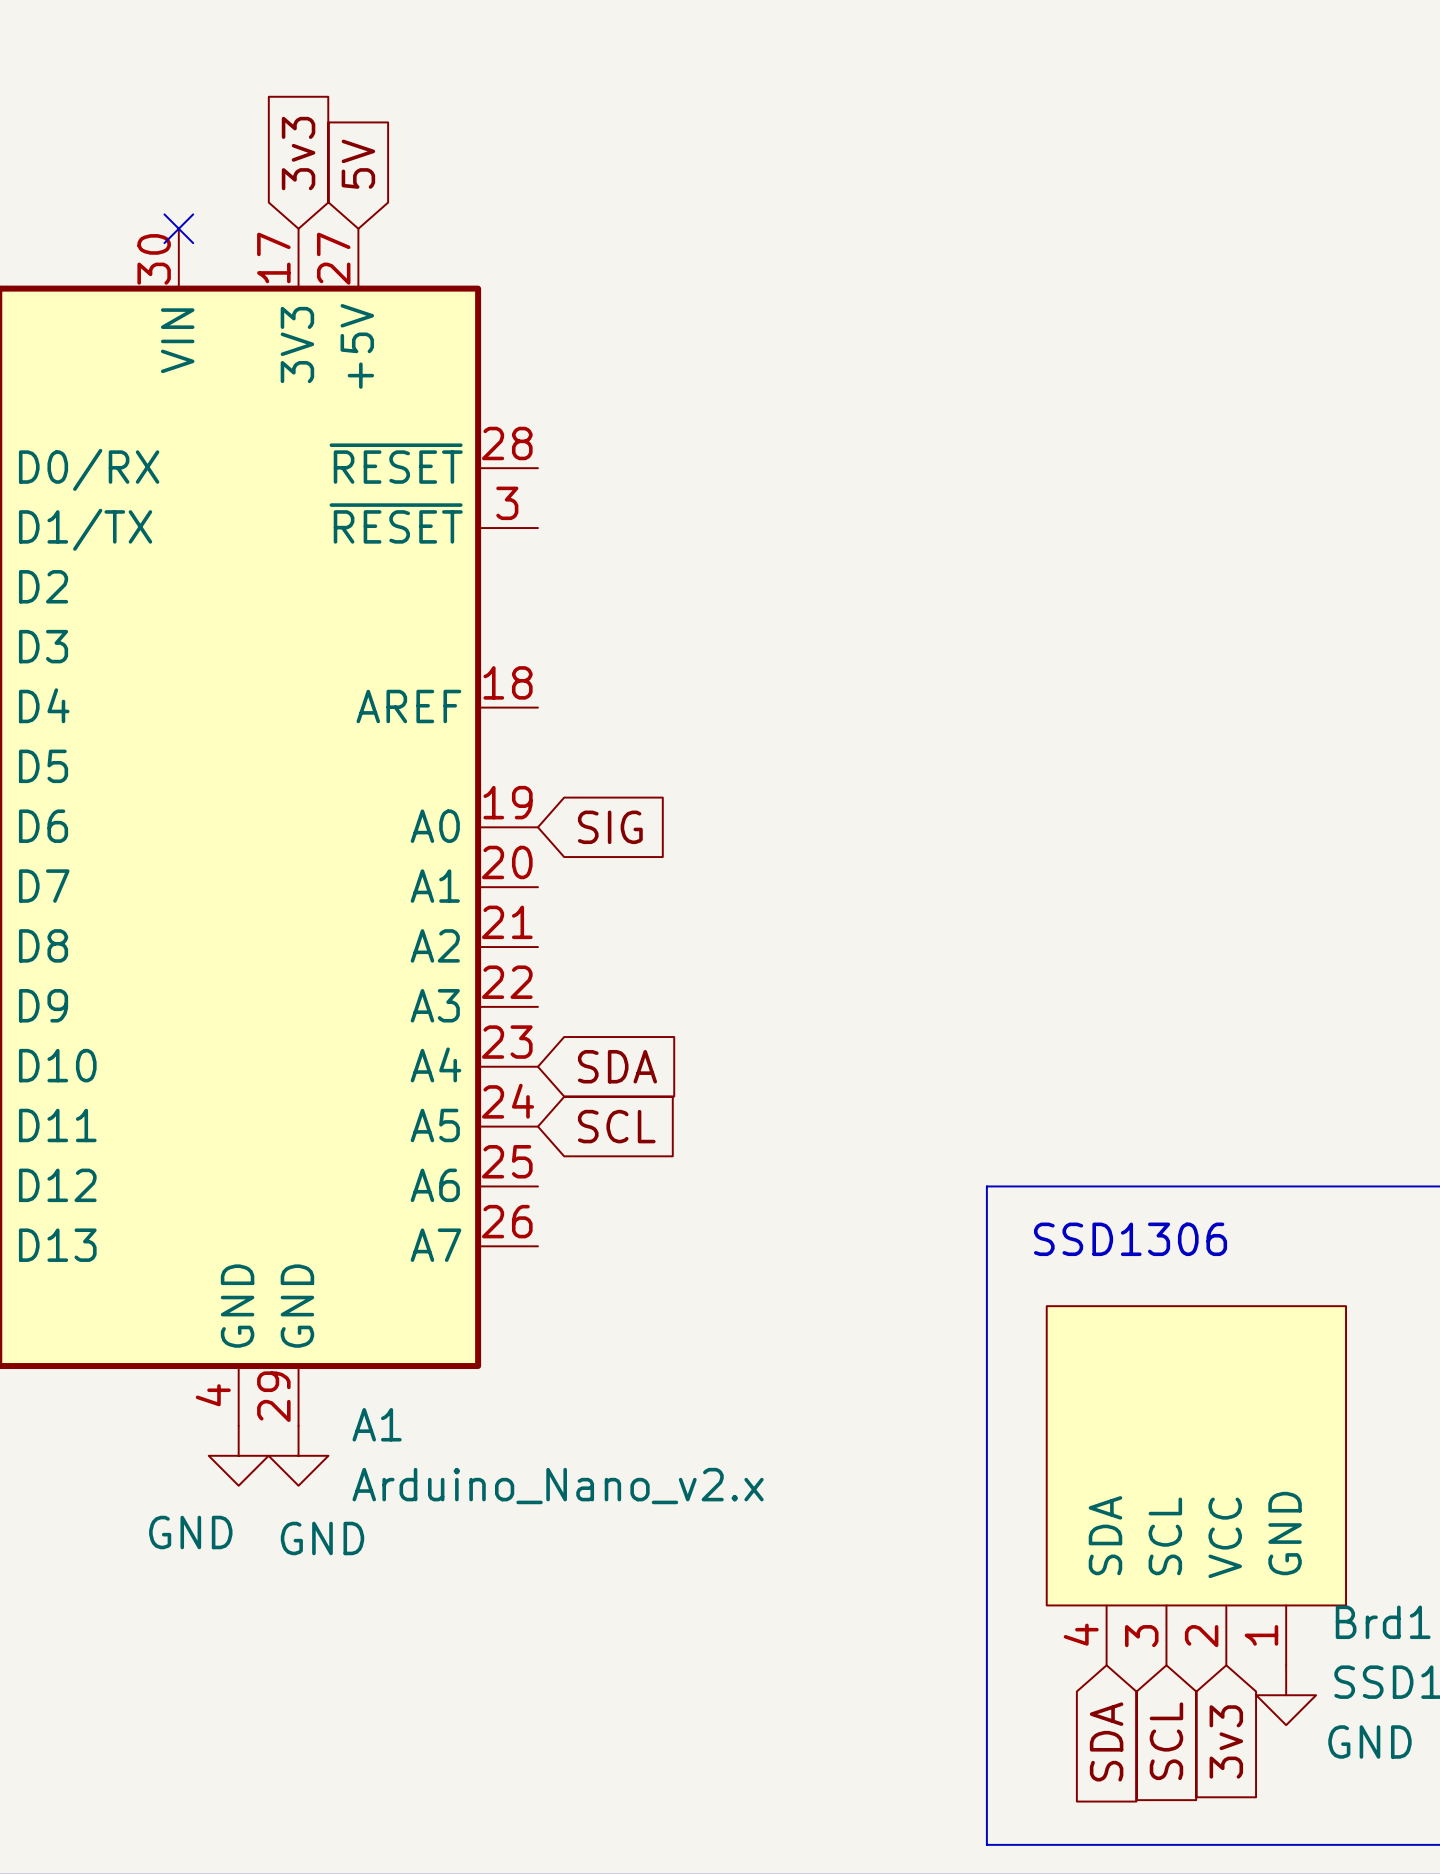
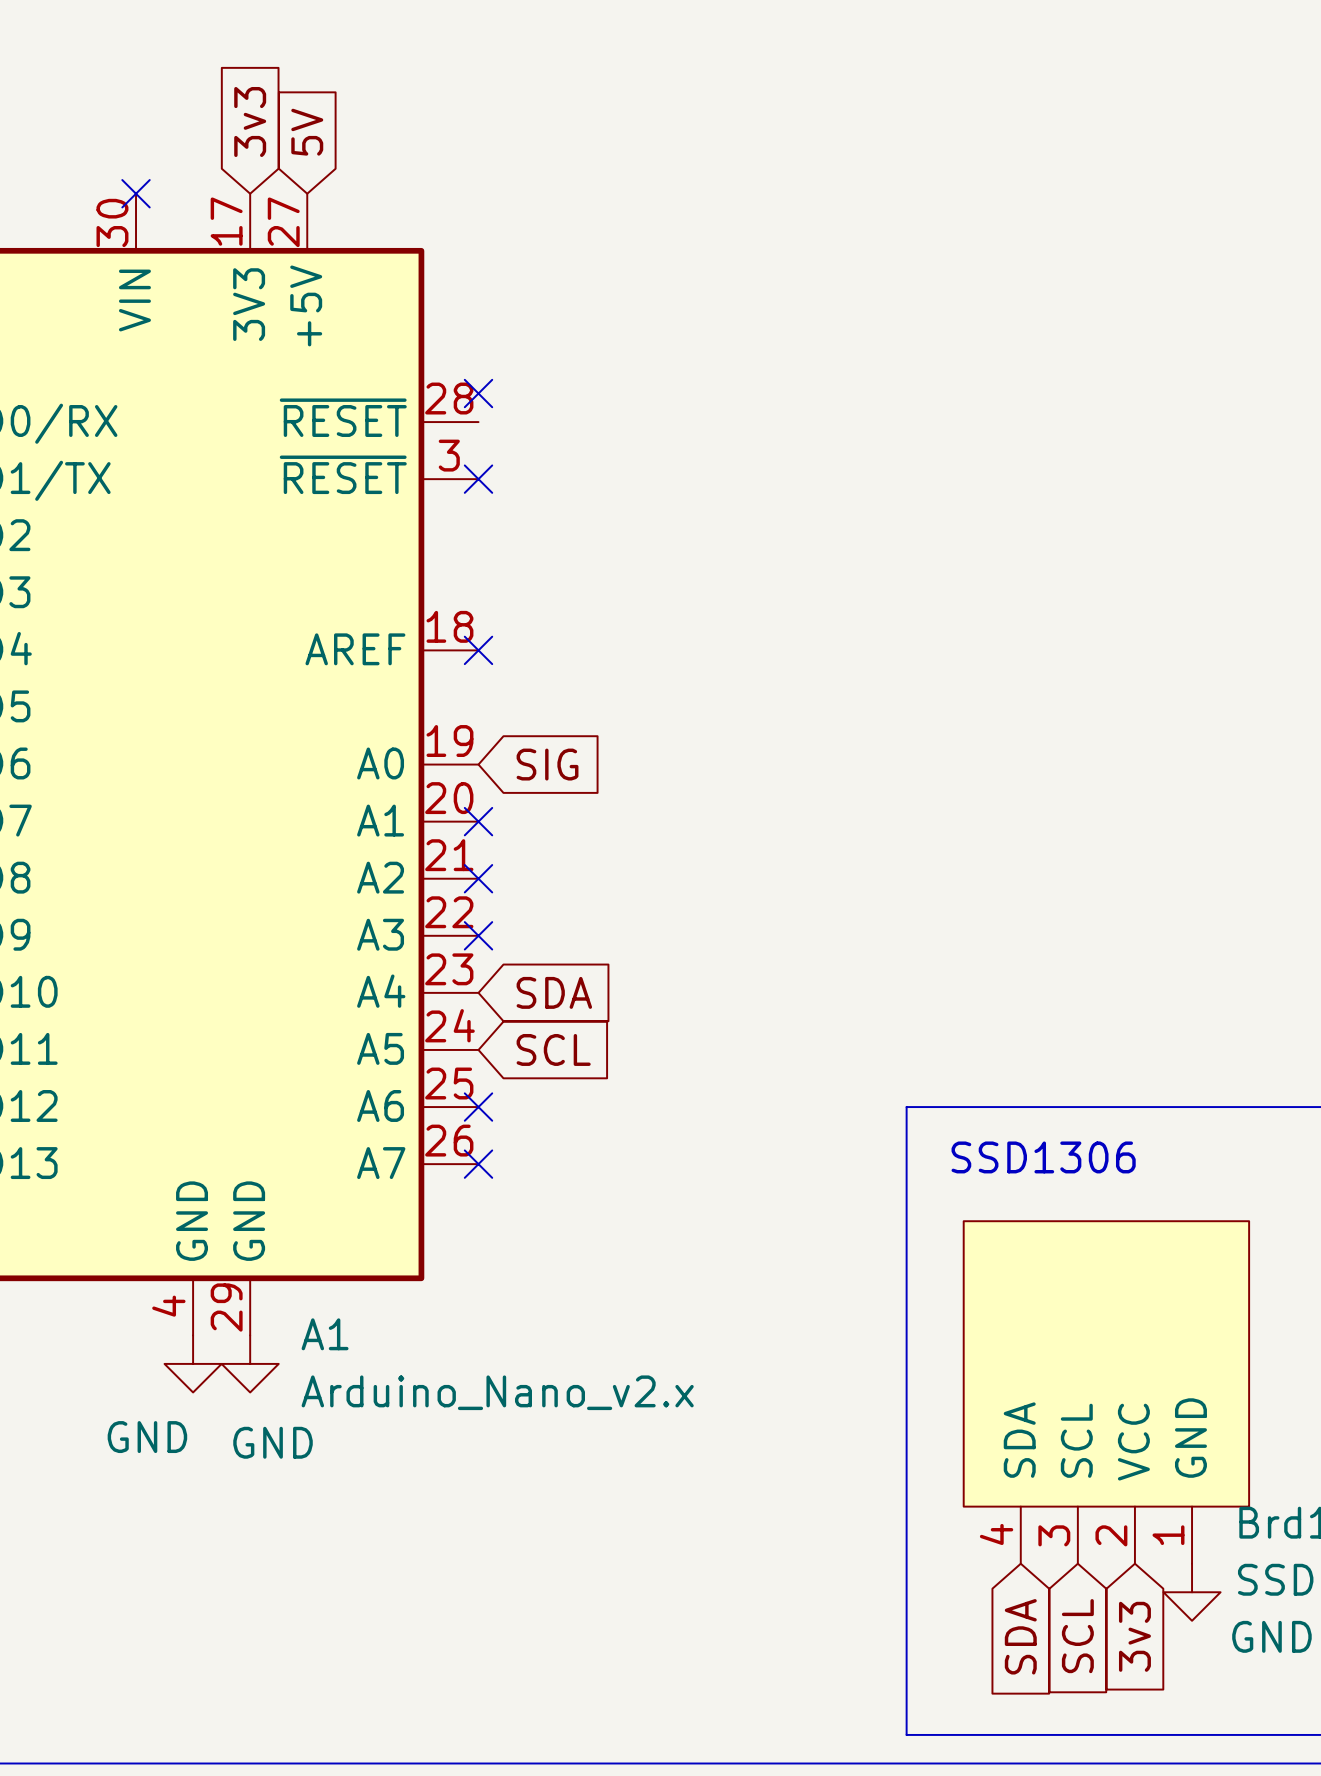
no-connect mark: none -> (478, 393)
no-connect mark: none -> (478, 479)
no-connect mark: none -> (478, 650)
no-connect mark: none -> (478, 821)
no-connect mark: none -> (478, 878)
no-connect mark: none -> (478, 935)
no-connect mark: none -> (478, 1107)
no-connect mark: none -> (478, 1164)

